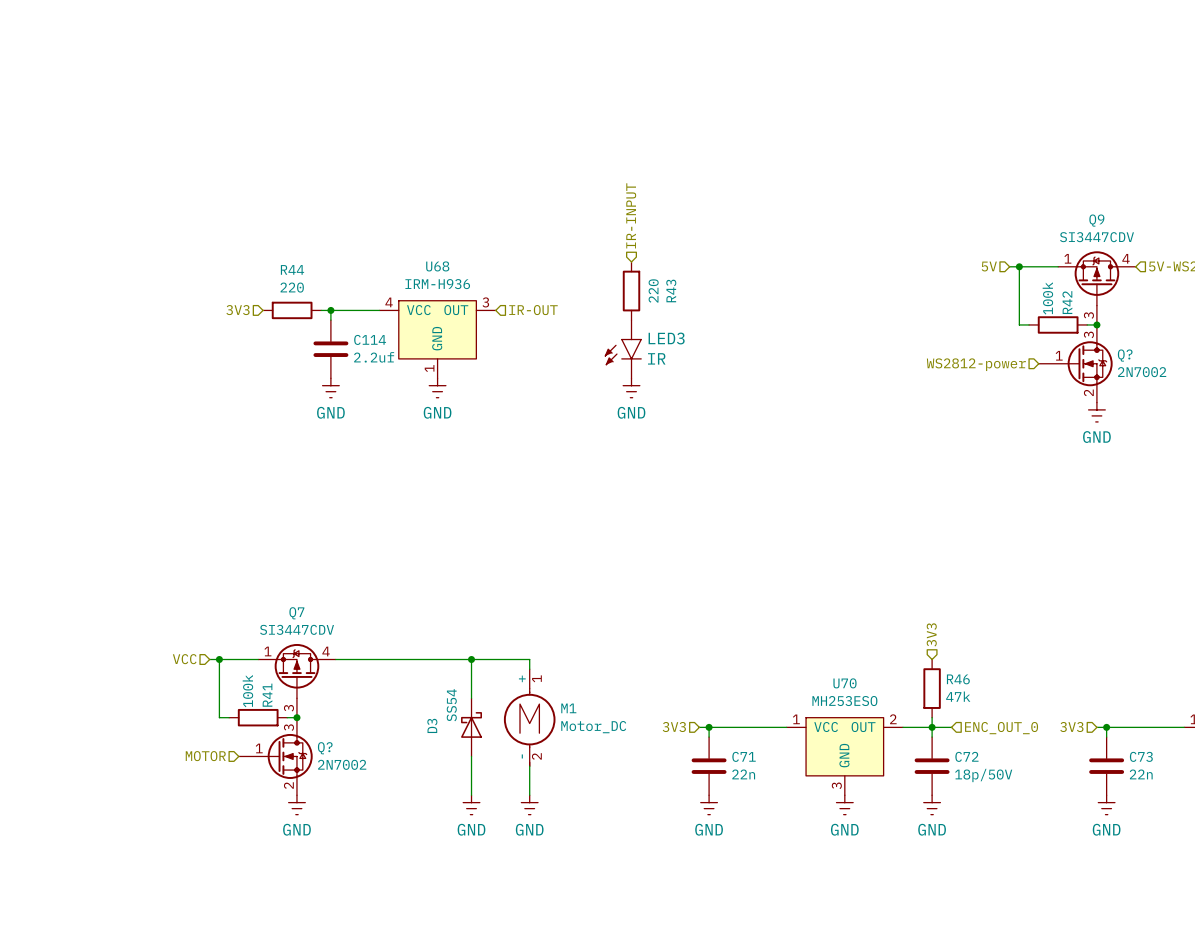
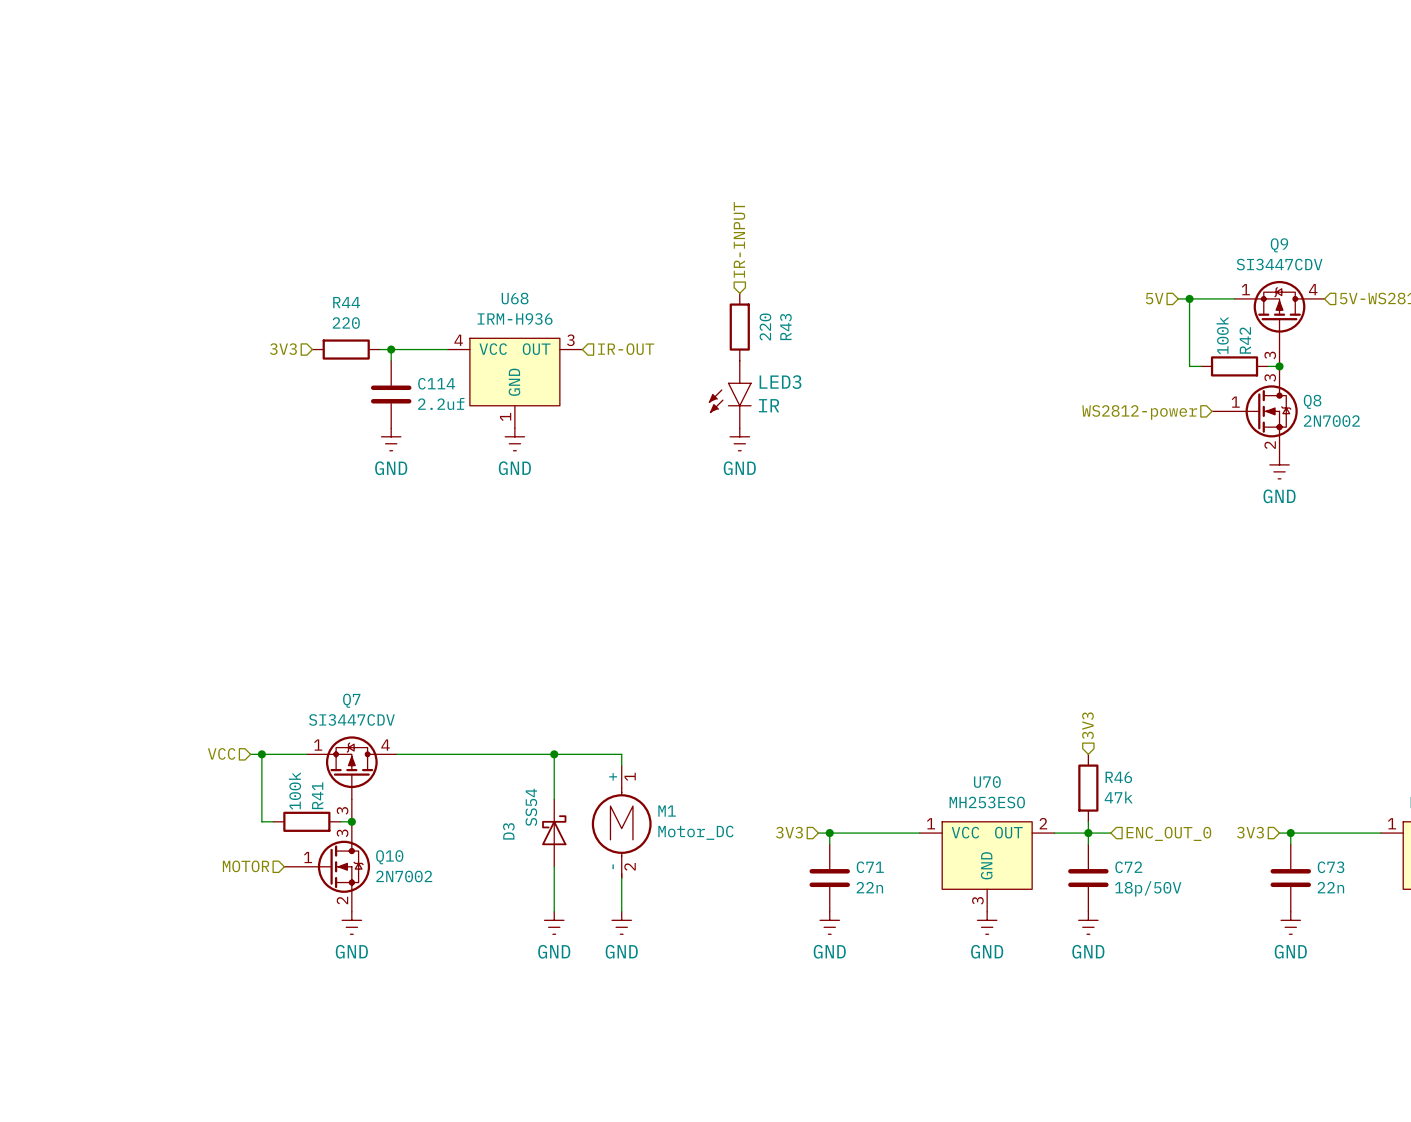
Q? name: Q? (1125, 355) -> Q8 (1312, 401)
Q? name: Q? (325, 748) -> Q10 (389, 857)

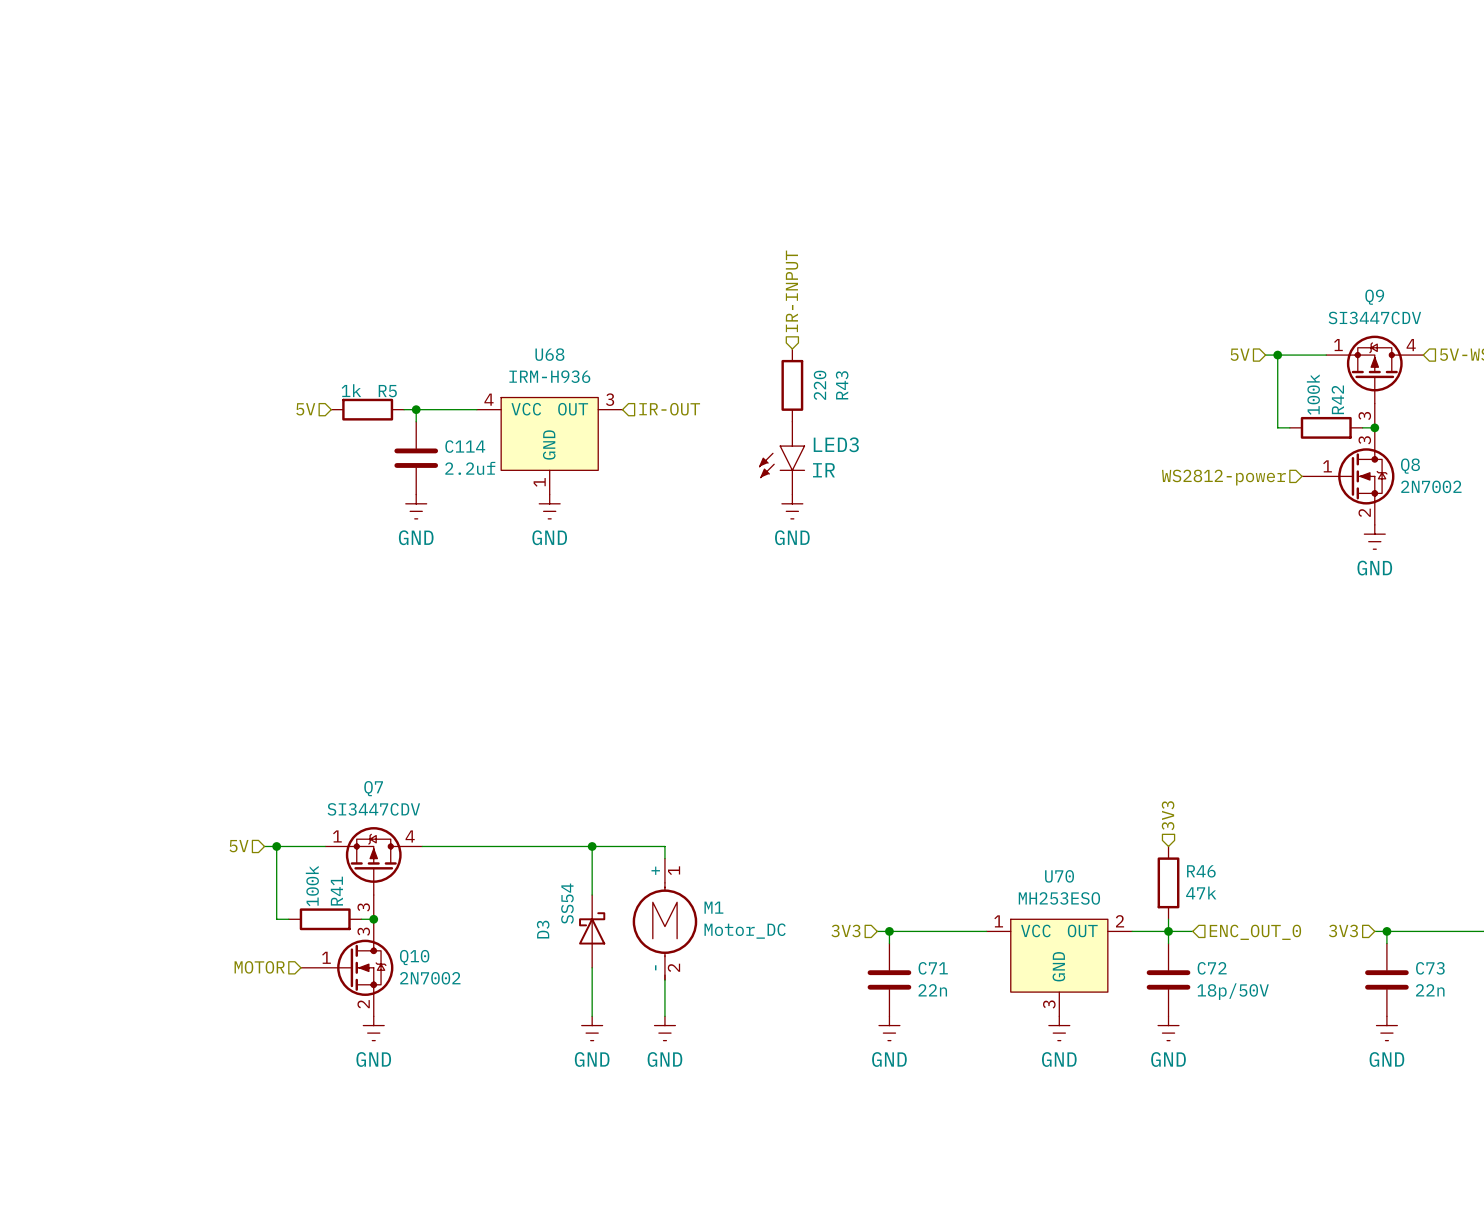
R44 name: R44 (346, 302) -> R5 (387, 391)
R44 value: 220 (346, 323) -> 1k (351, 390)
hierarchical label: 3V3 (283, 349) -> 5V (305, 409)
hierarchical label: VCC (221, 753) -> 5V (239, 846)

